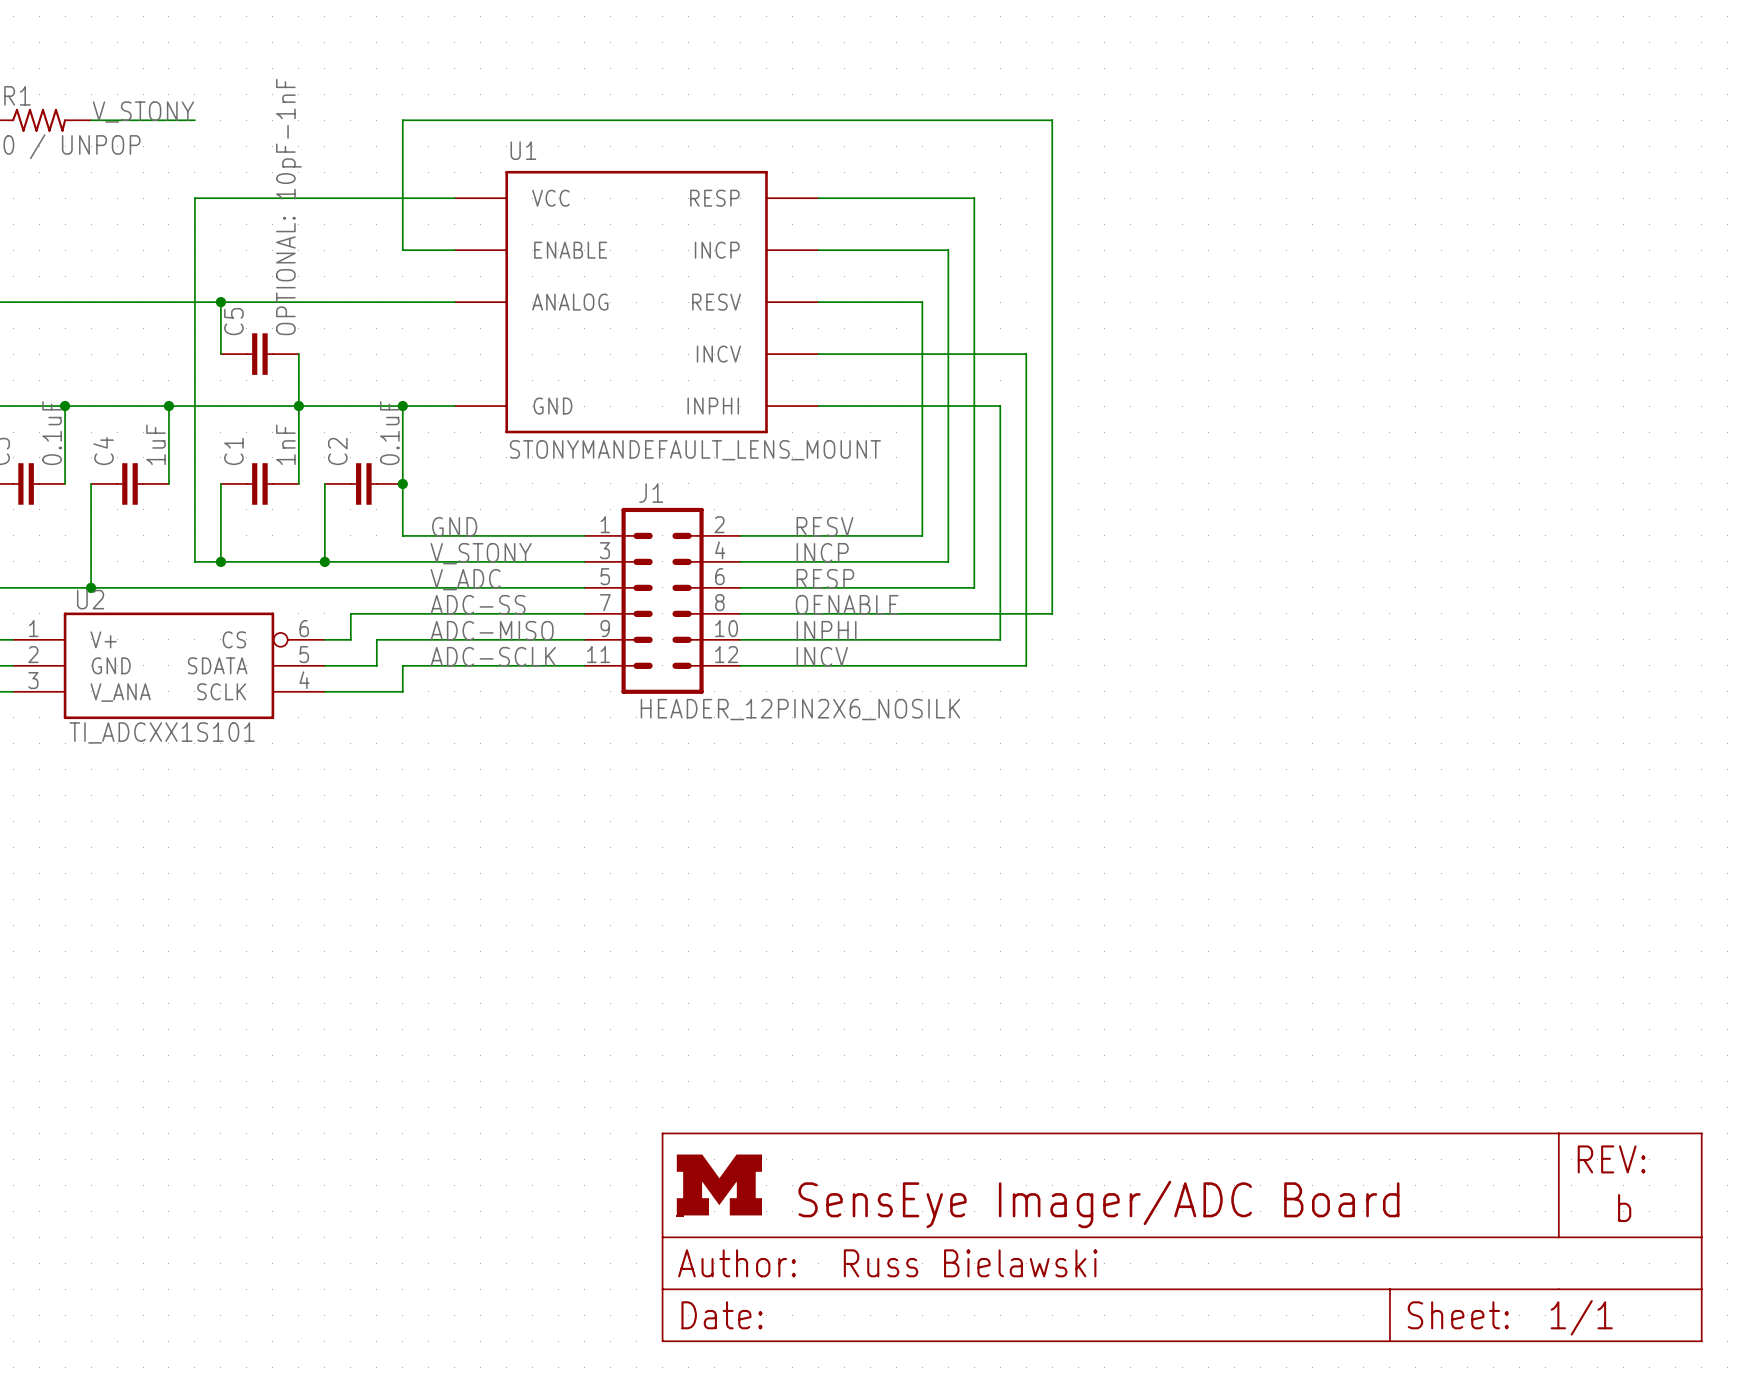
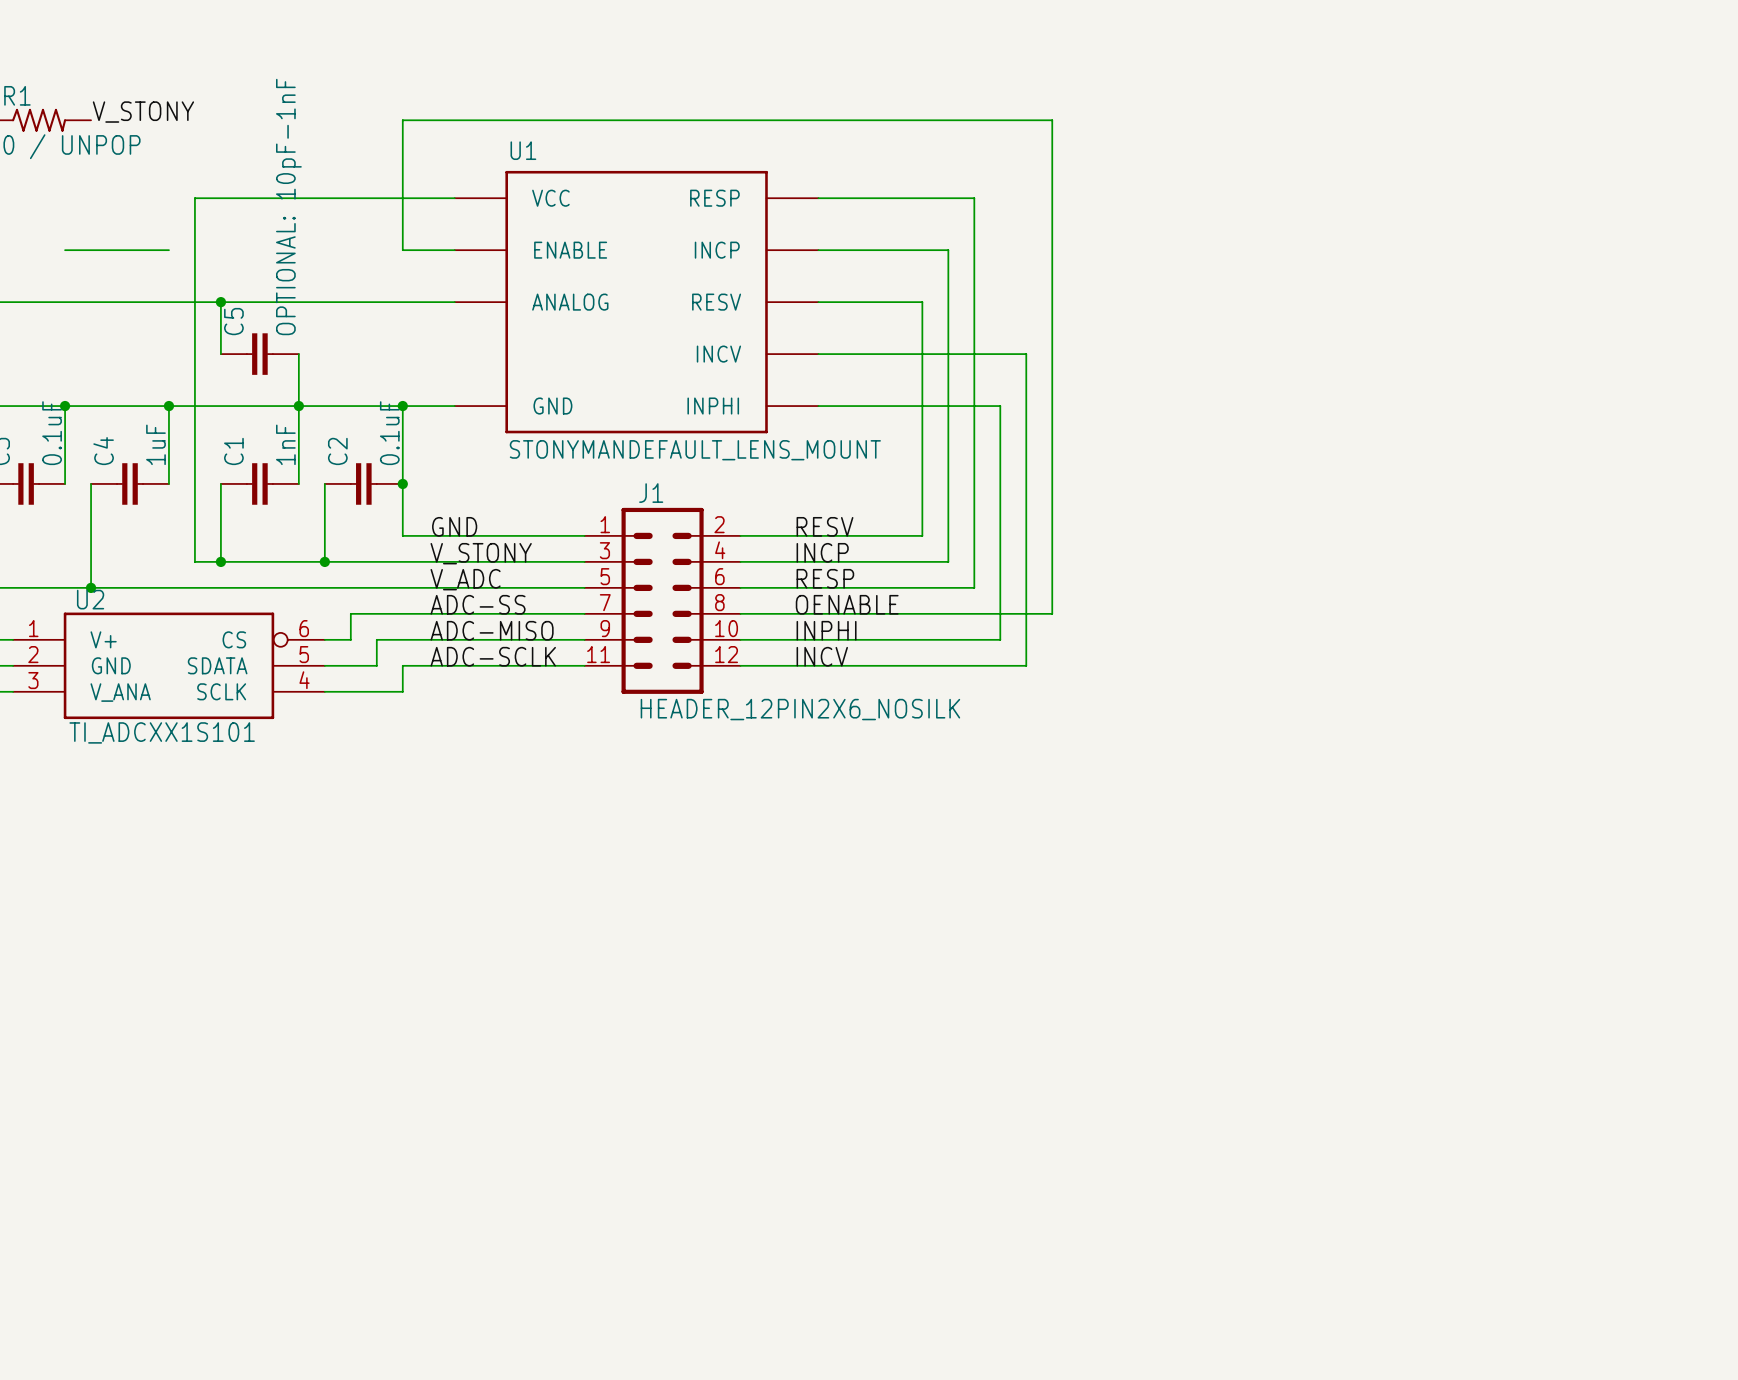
wire: (91, 120) (194, 120) -> (65, 250) (168, 250)
part: (1182, 1237) -> none

